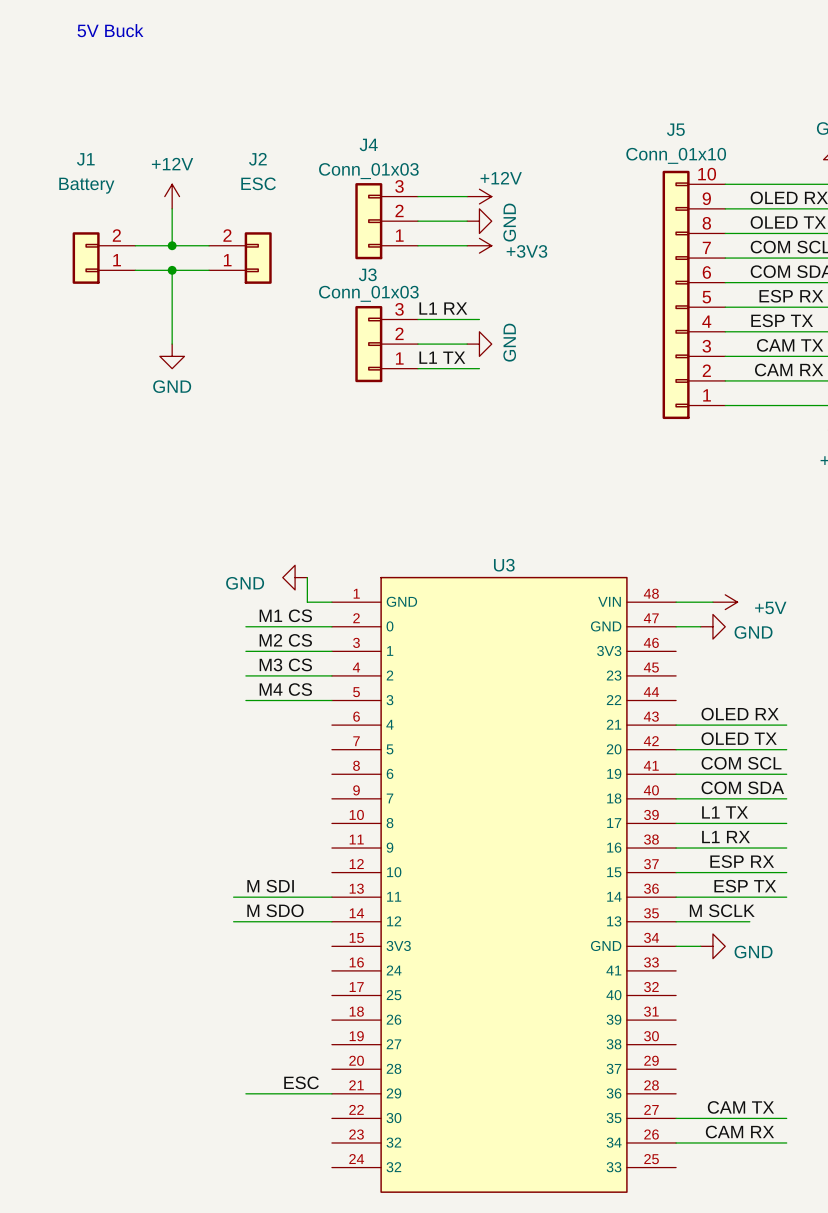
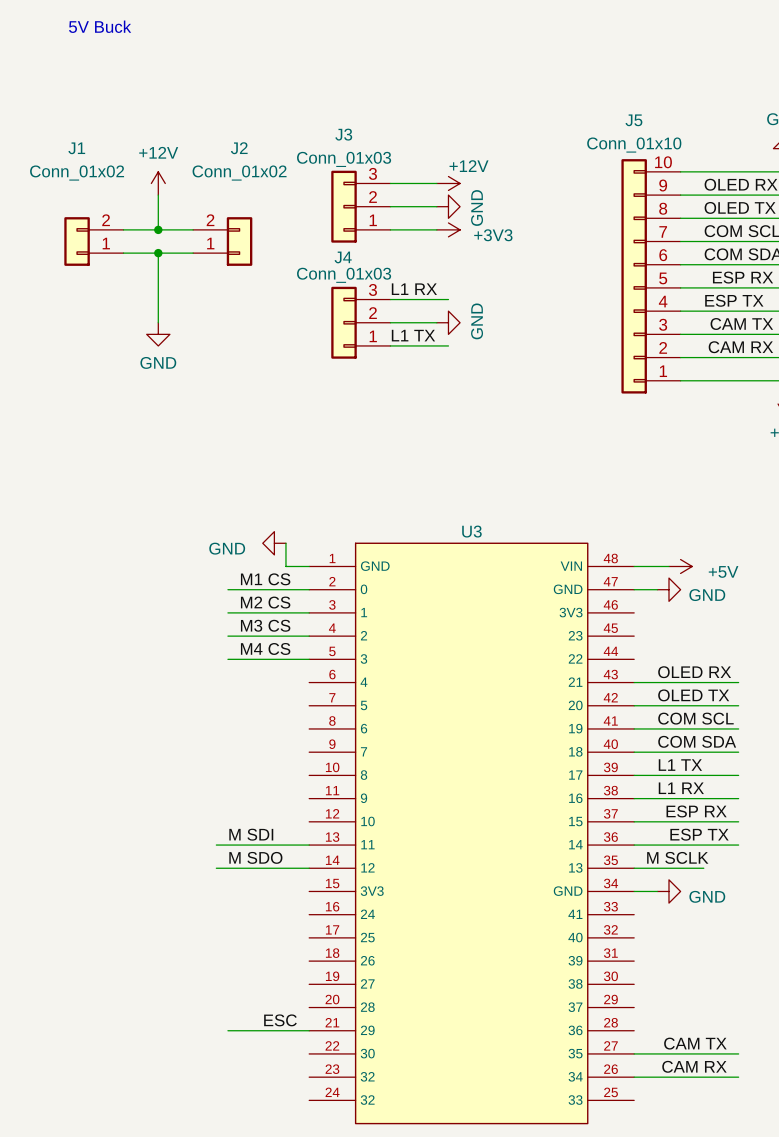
J4 name: J4 (368, 144) -> J3 (343, 134)
J2 value: ESC (258, 183) -> Conn_01x02 (239, 173)
J1 value: Battery (86, 185) -> Conn_01x02 (77, 173)
J3 name: J3 (367, 274) -> J4 (343, 257)

